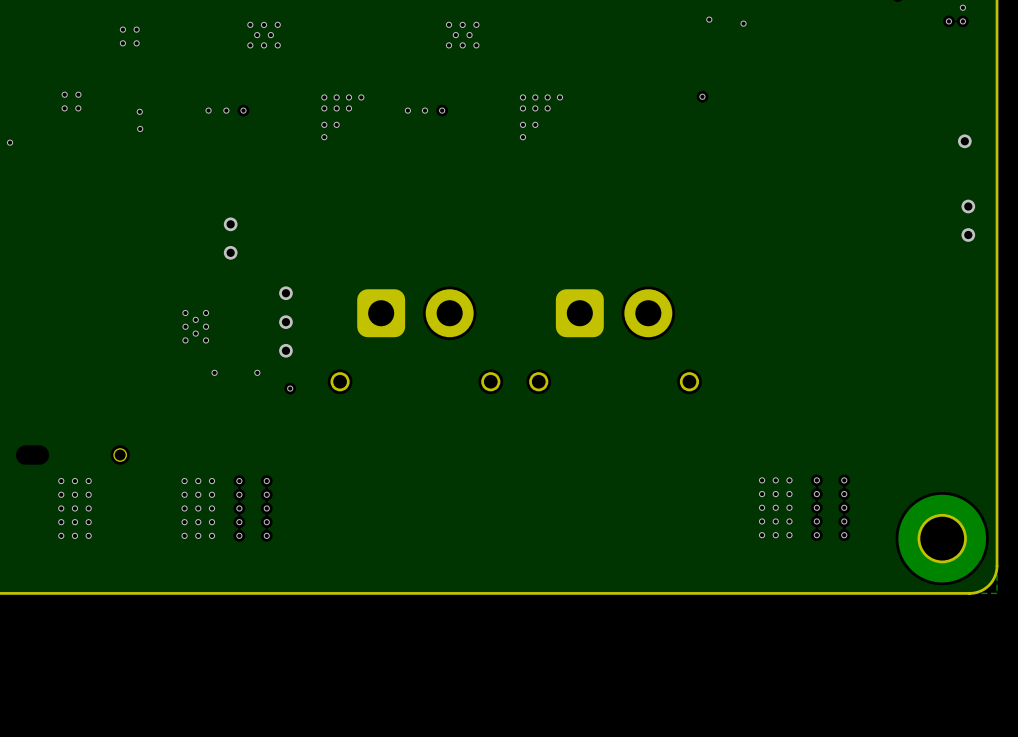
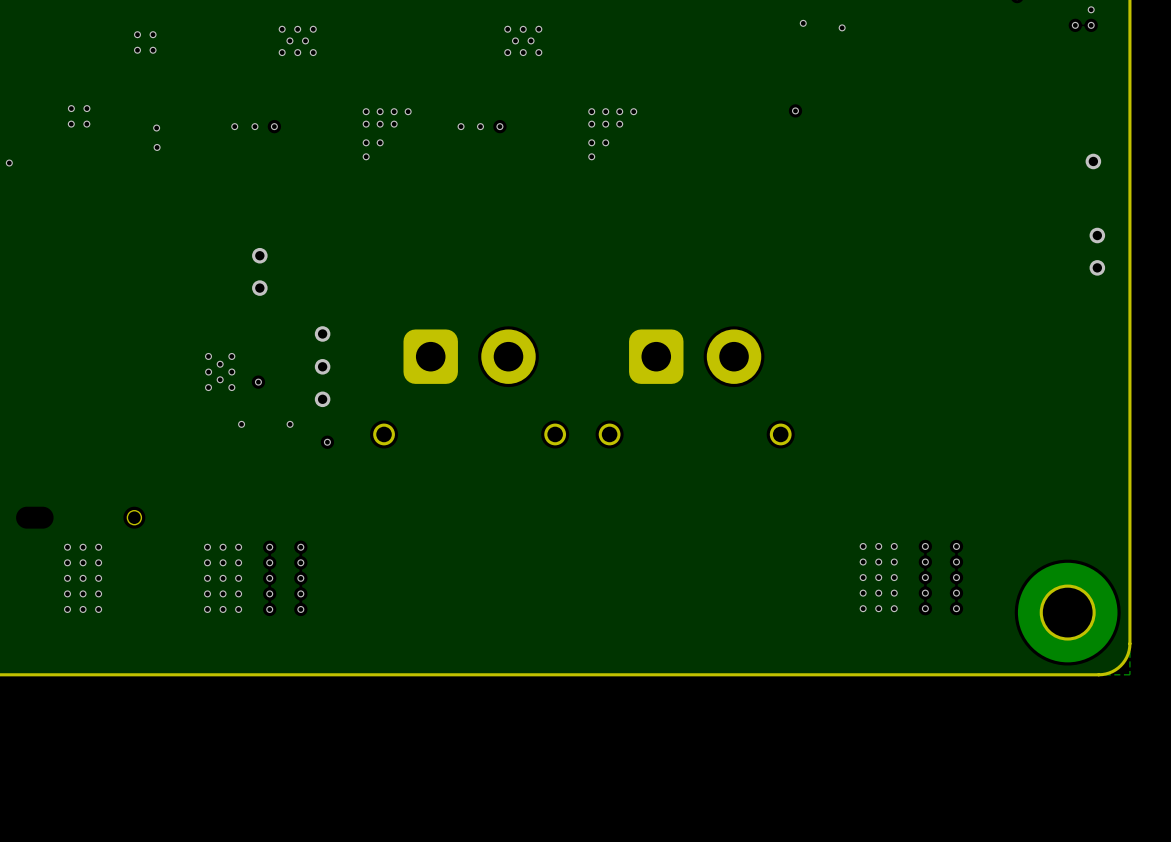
via: none -> (258, 382)

